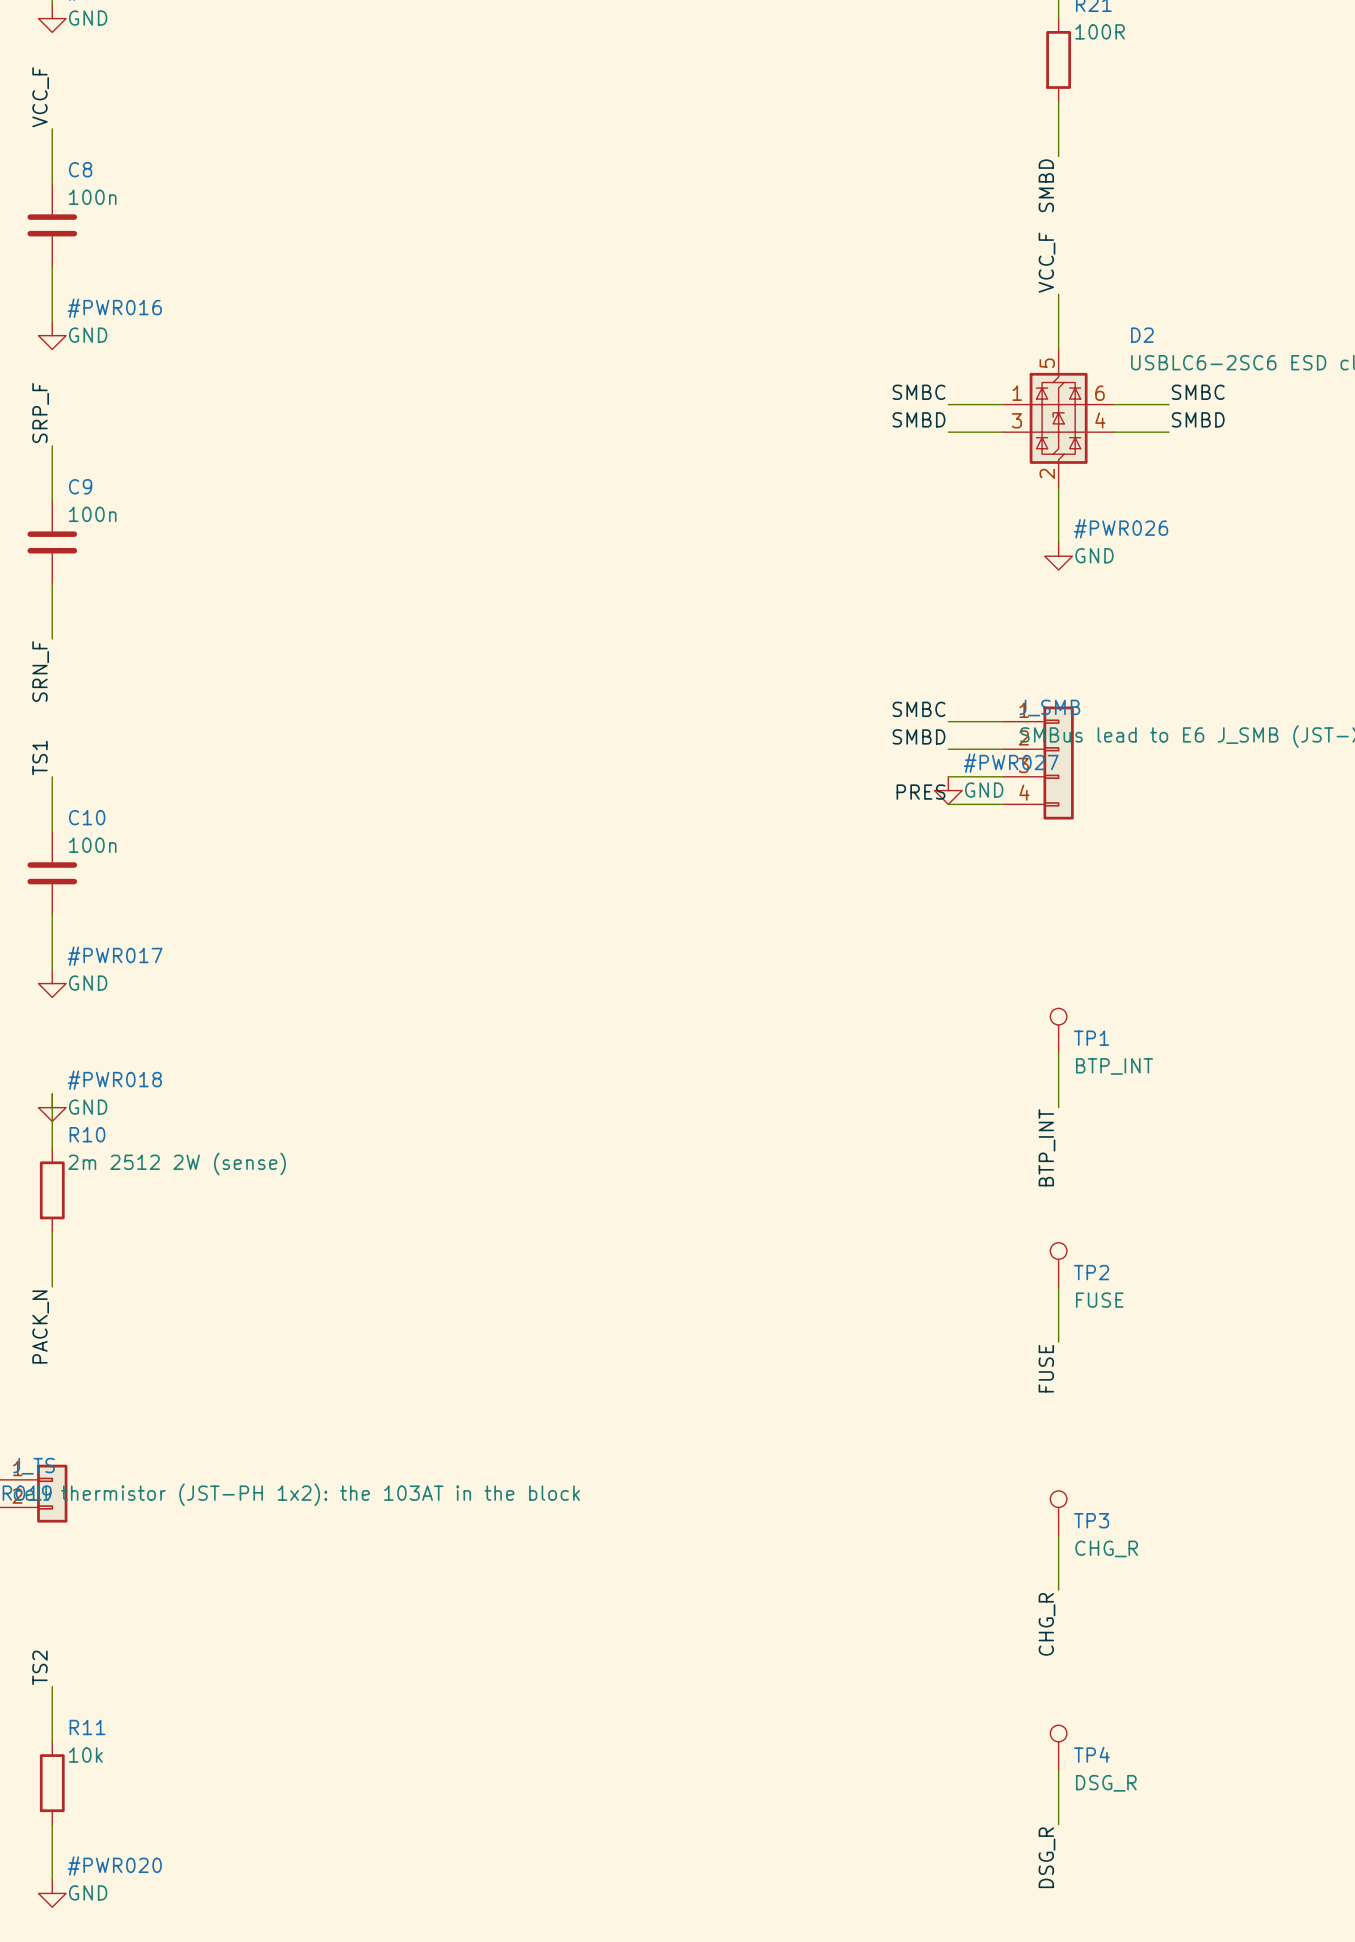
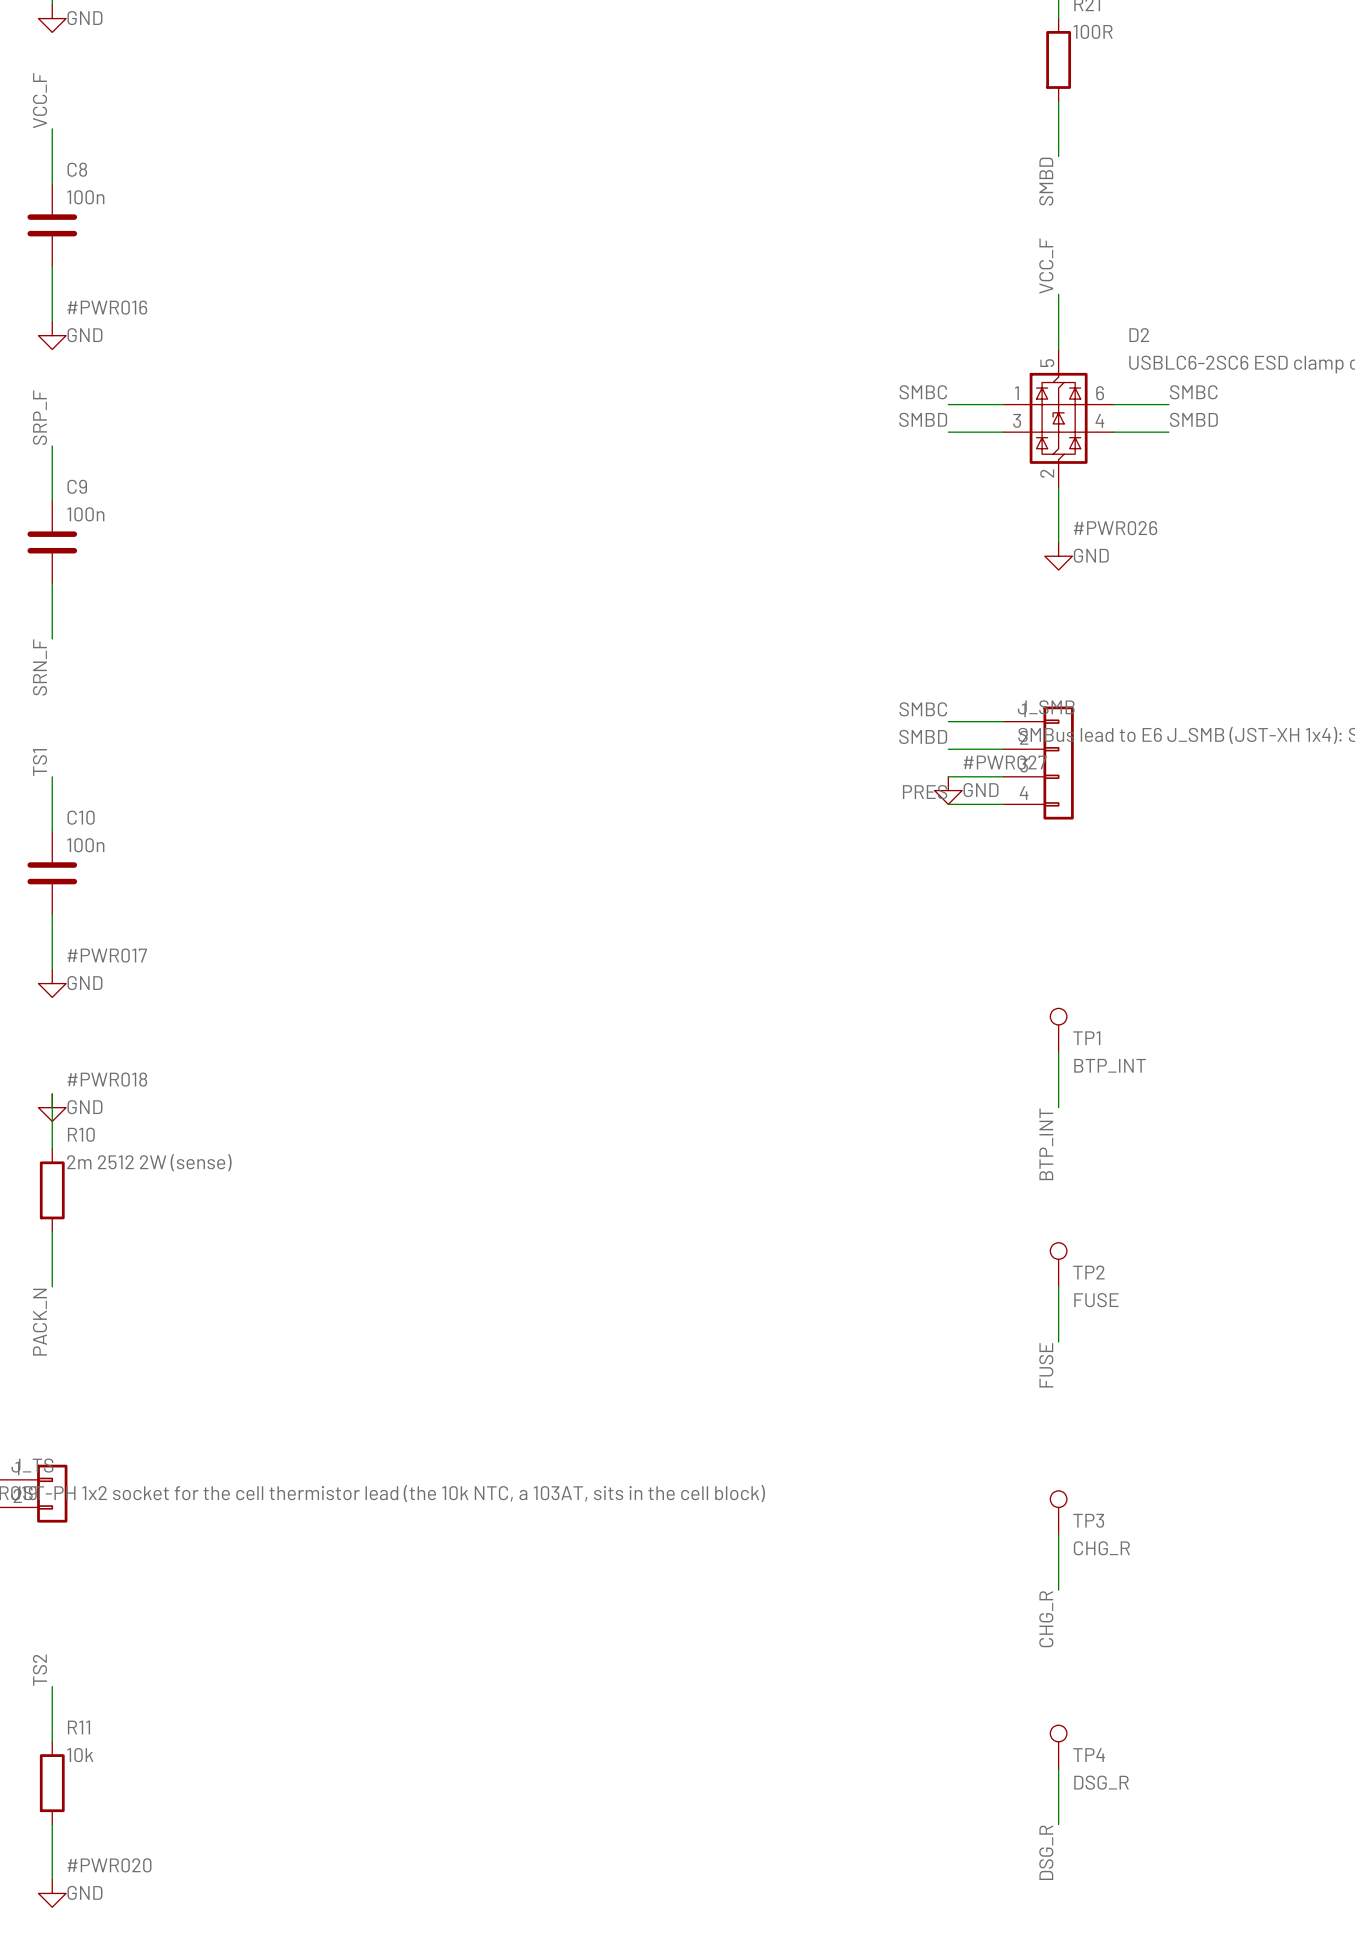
J_TS value: cell thermistor (JST-PH 1x2): the 103AT in the block (296, 1494) -> JST-PH 1x2 socket for the cell thermistor lead (the 10k NTC, a 103AT, sits in the cell block) (388, 1493)

